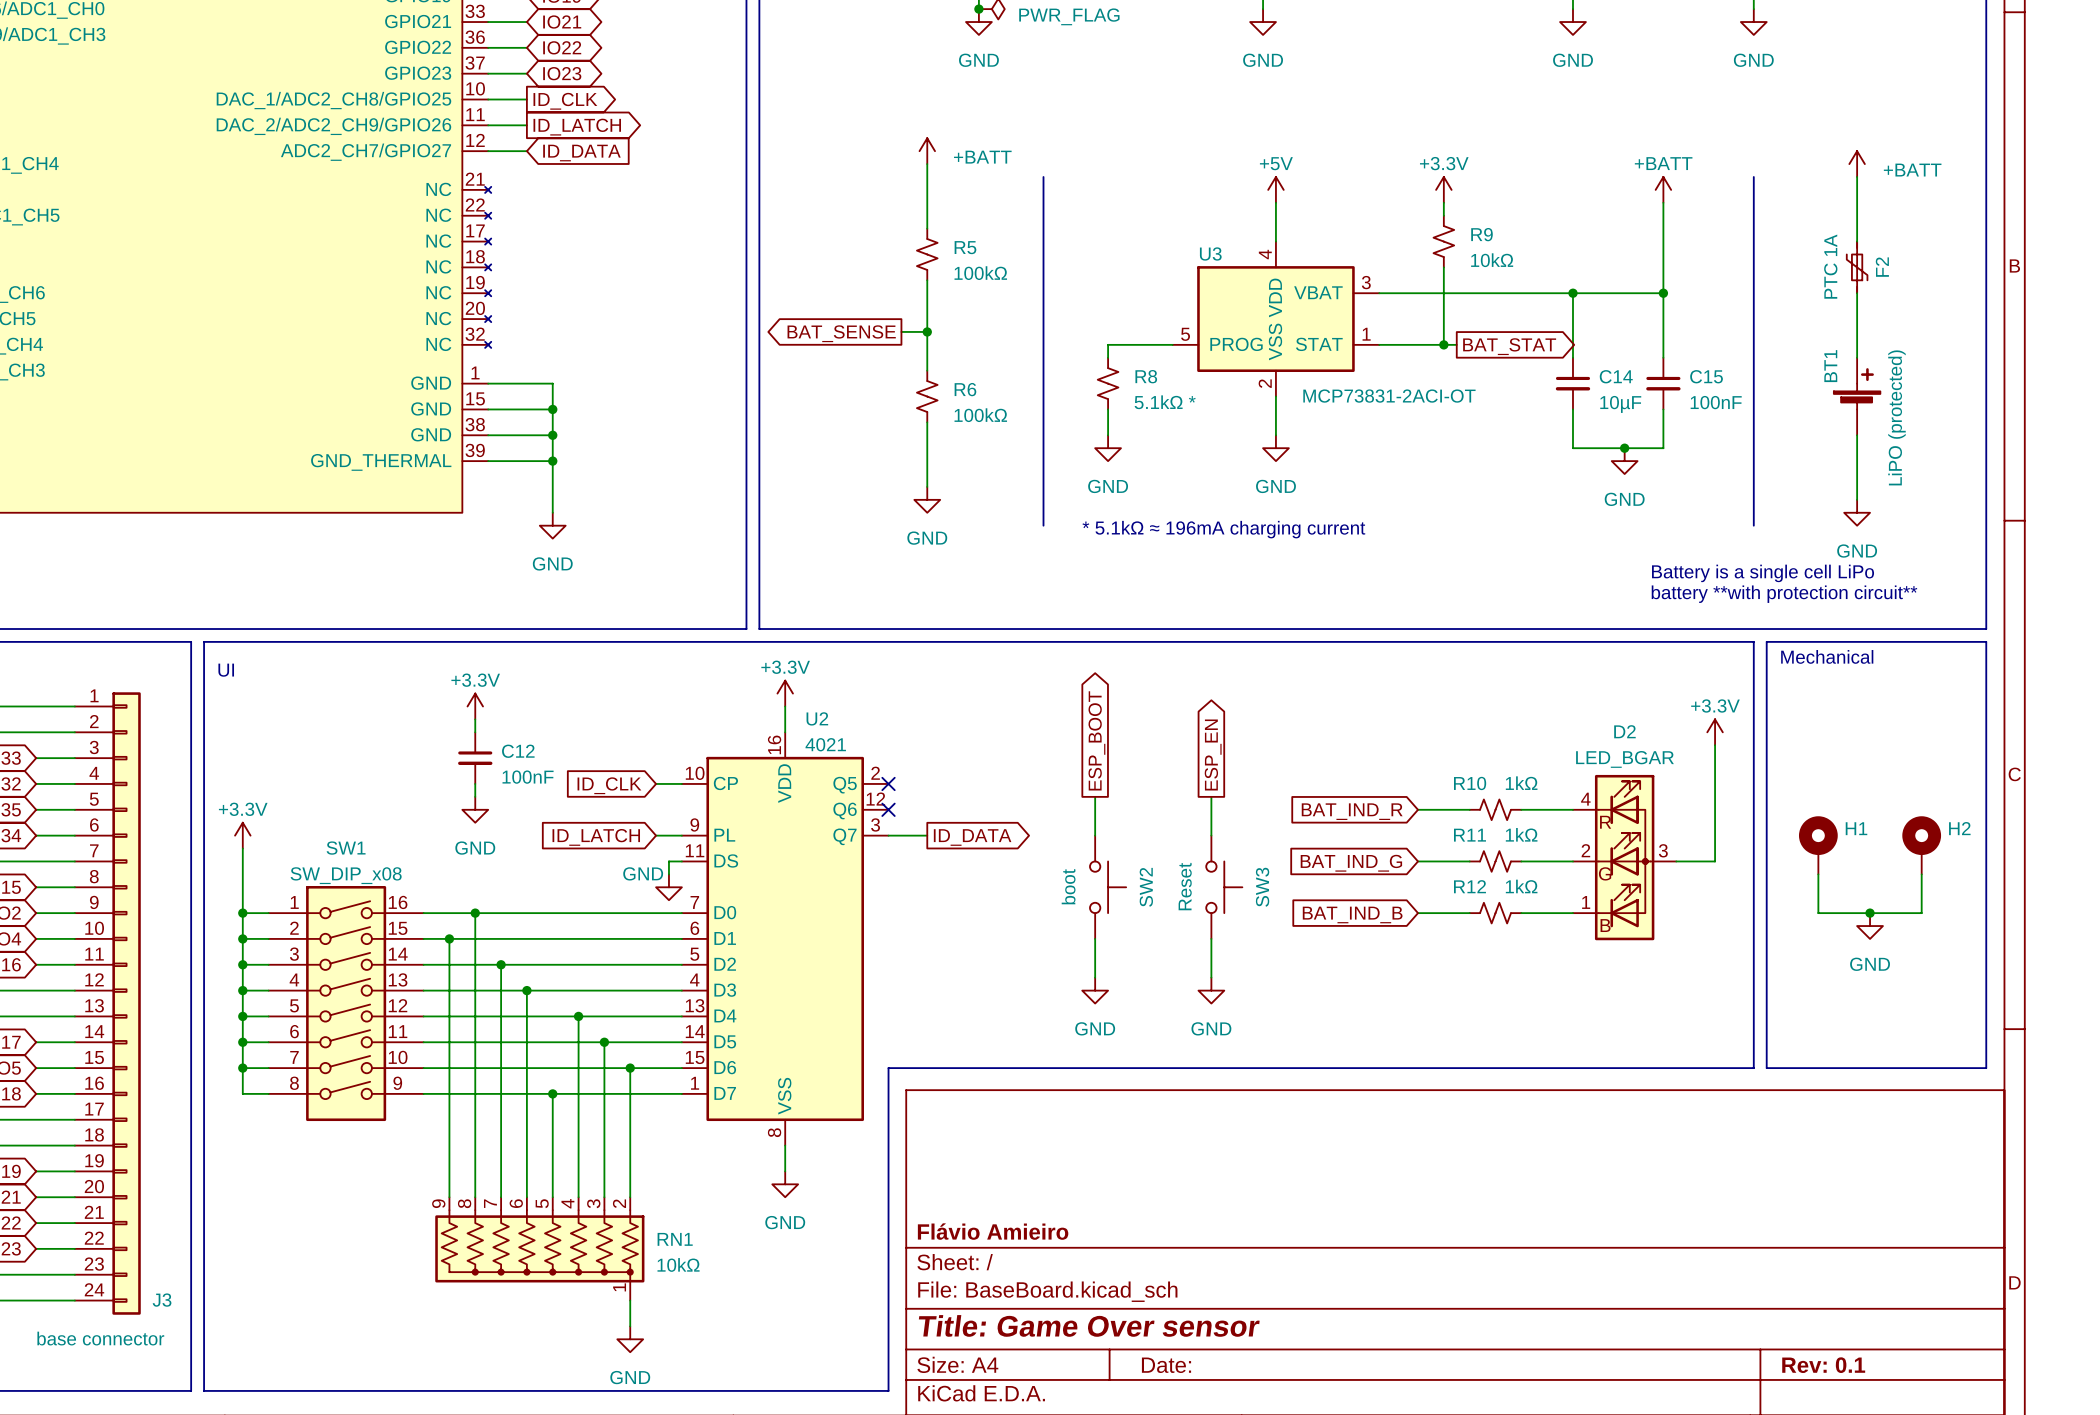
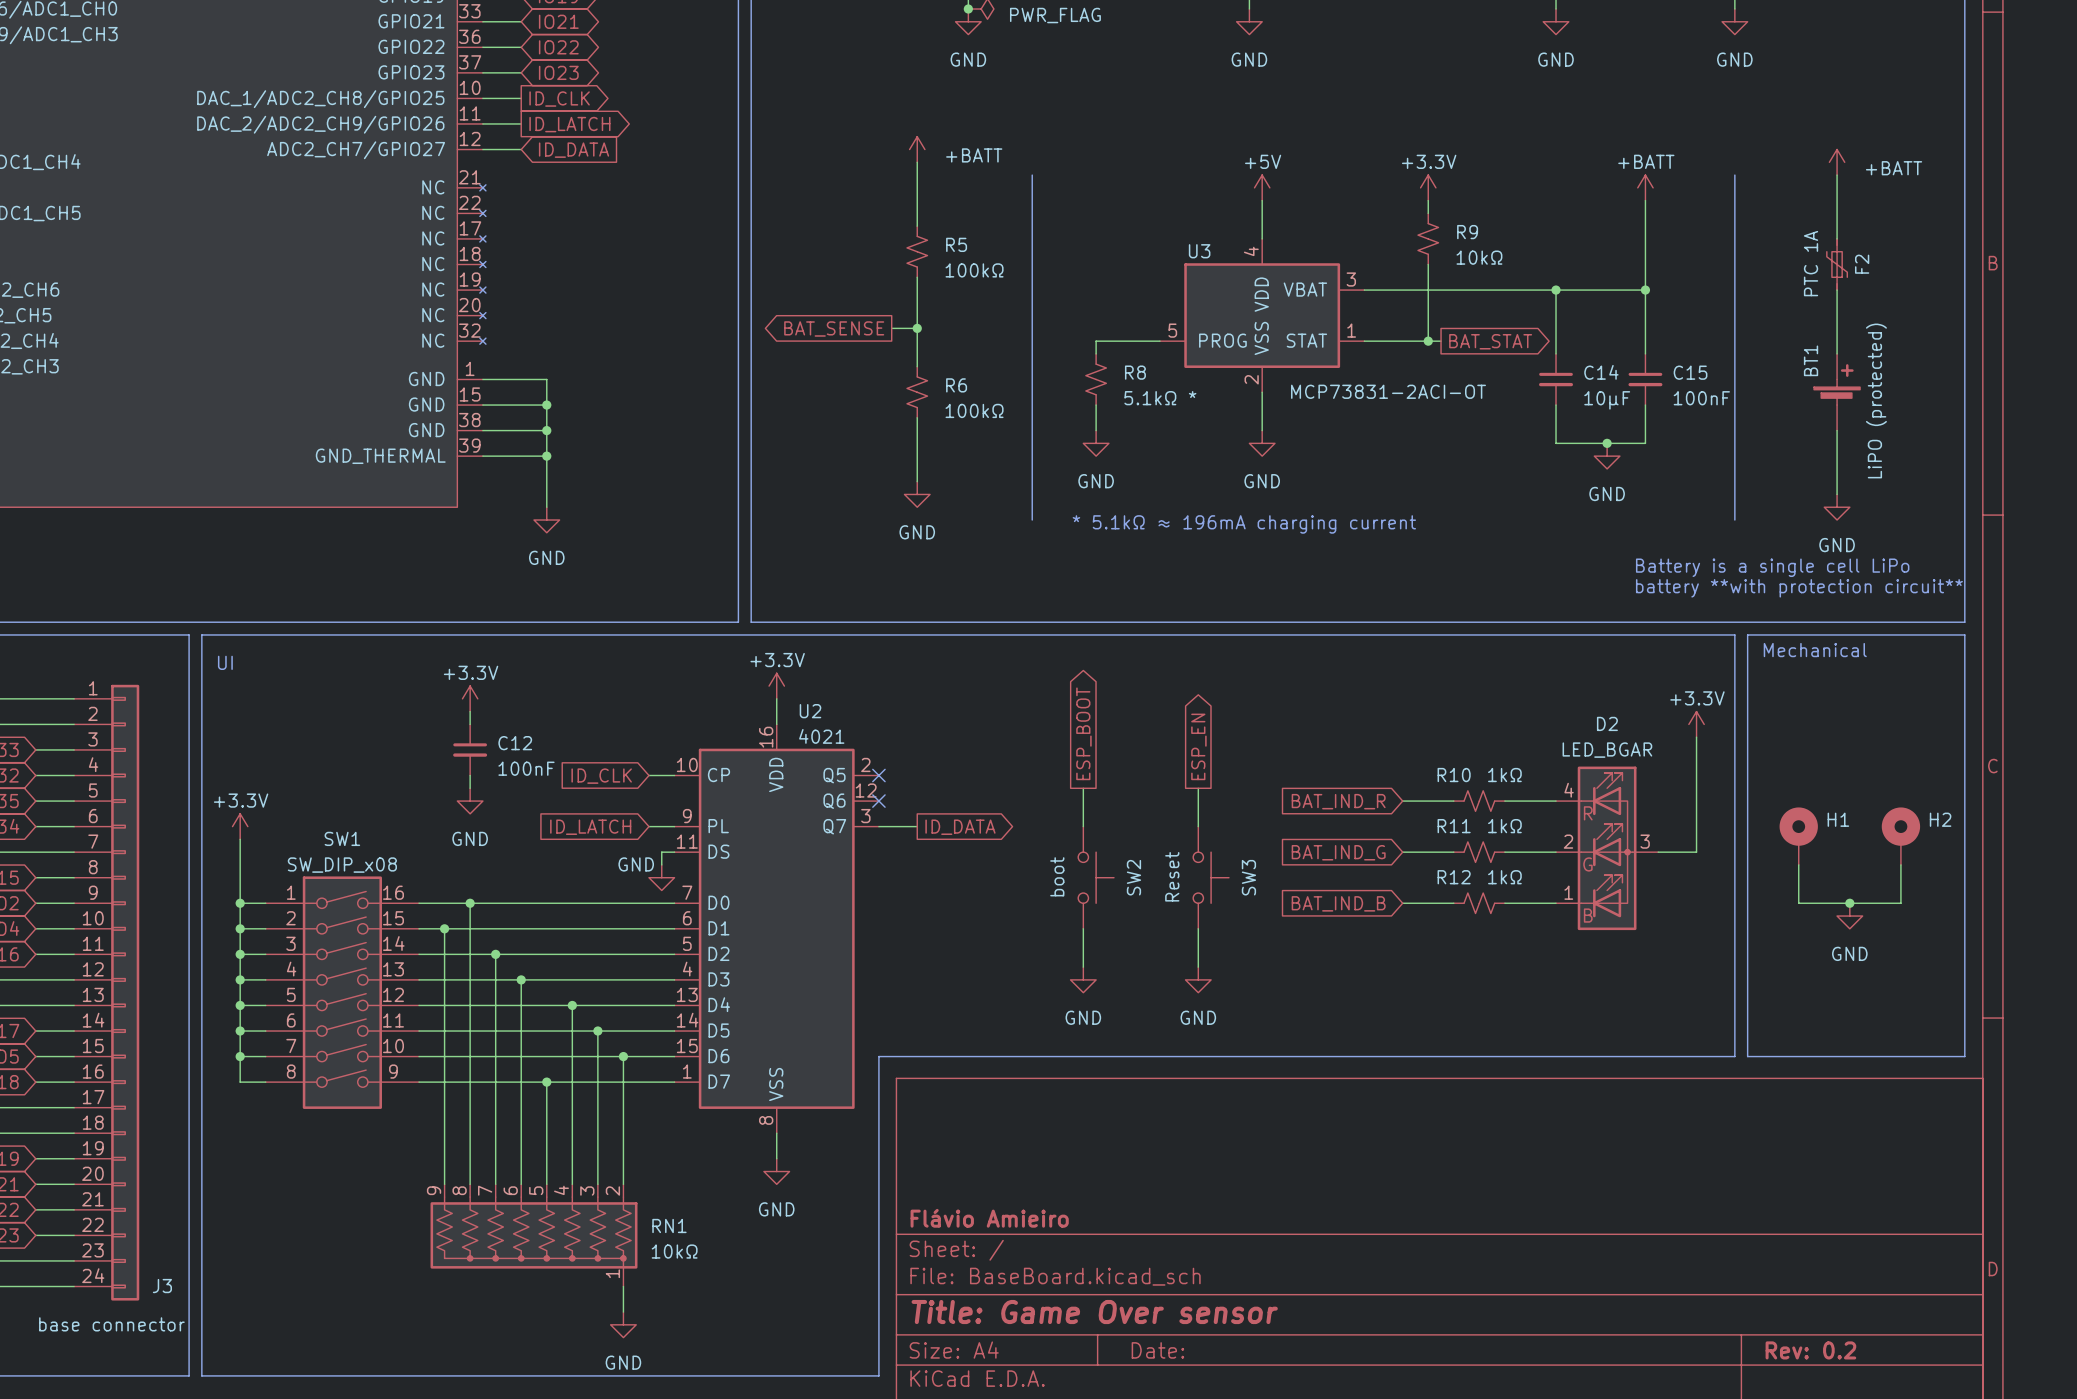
title block: Rev: 0.1 (1823, 1365) -> Rev: 0.2 (1810, 1350)

